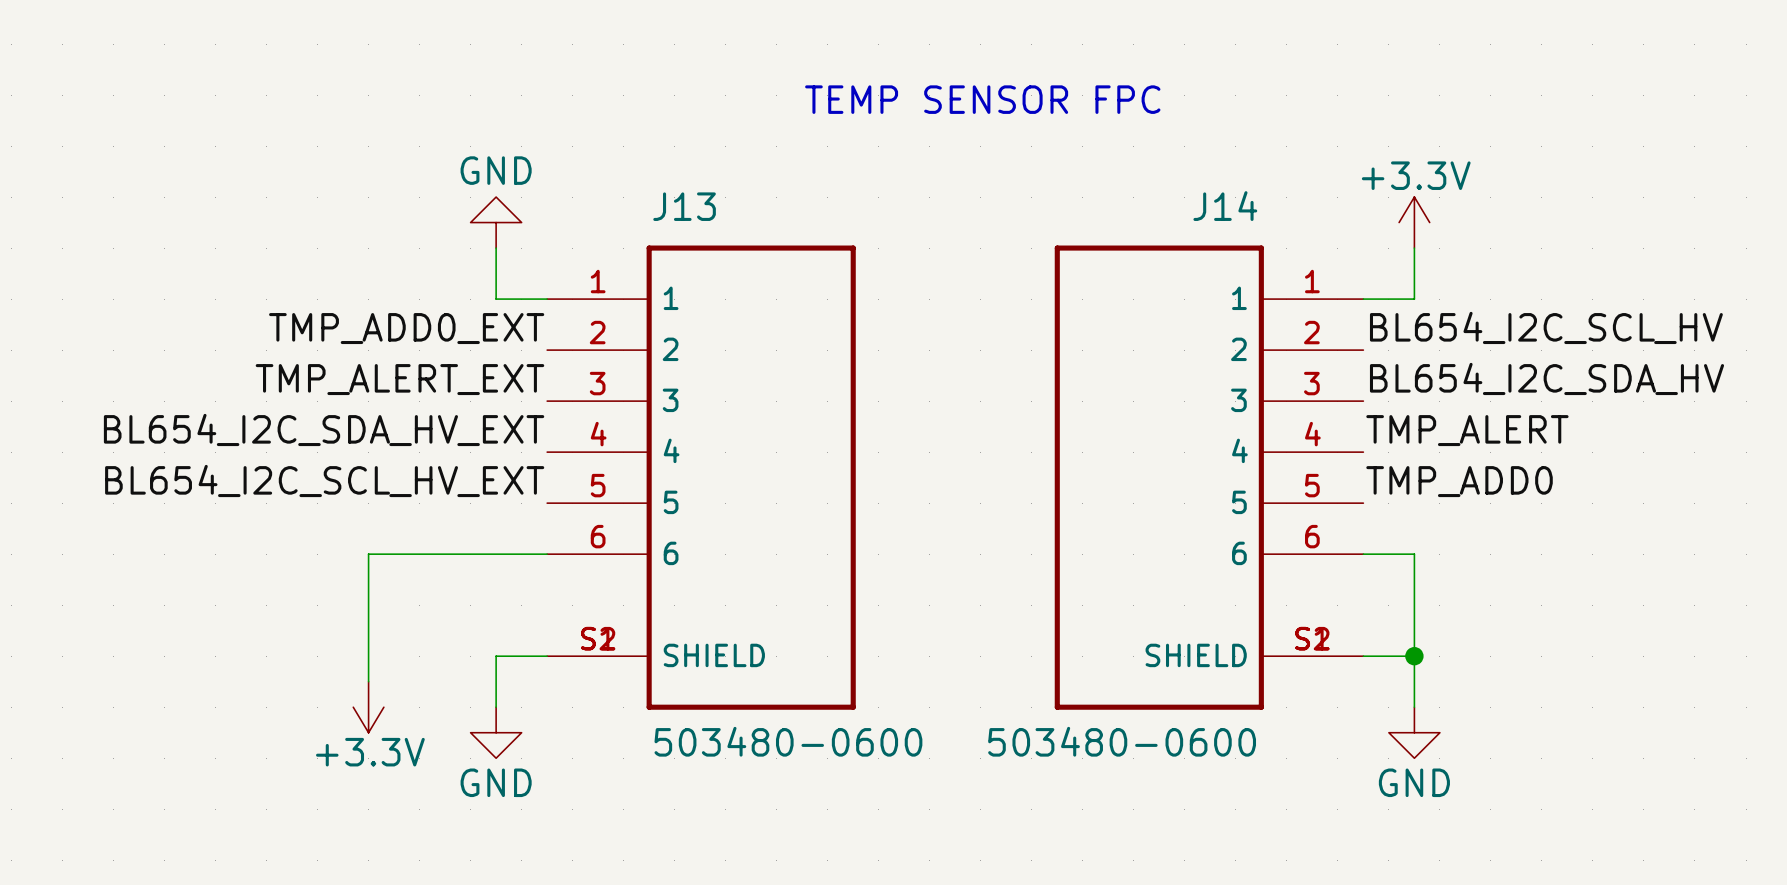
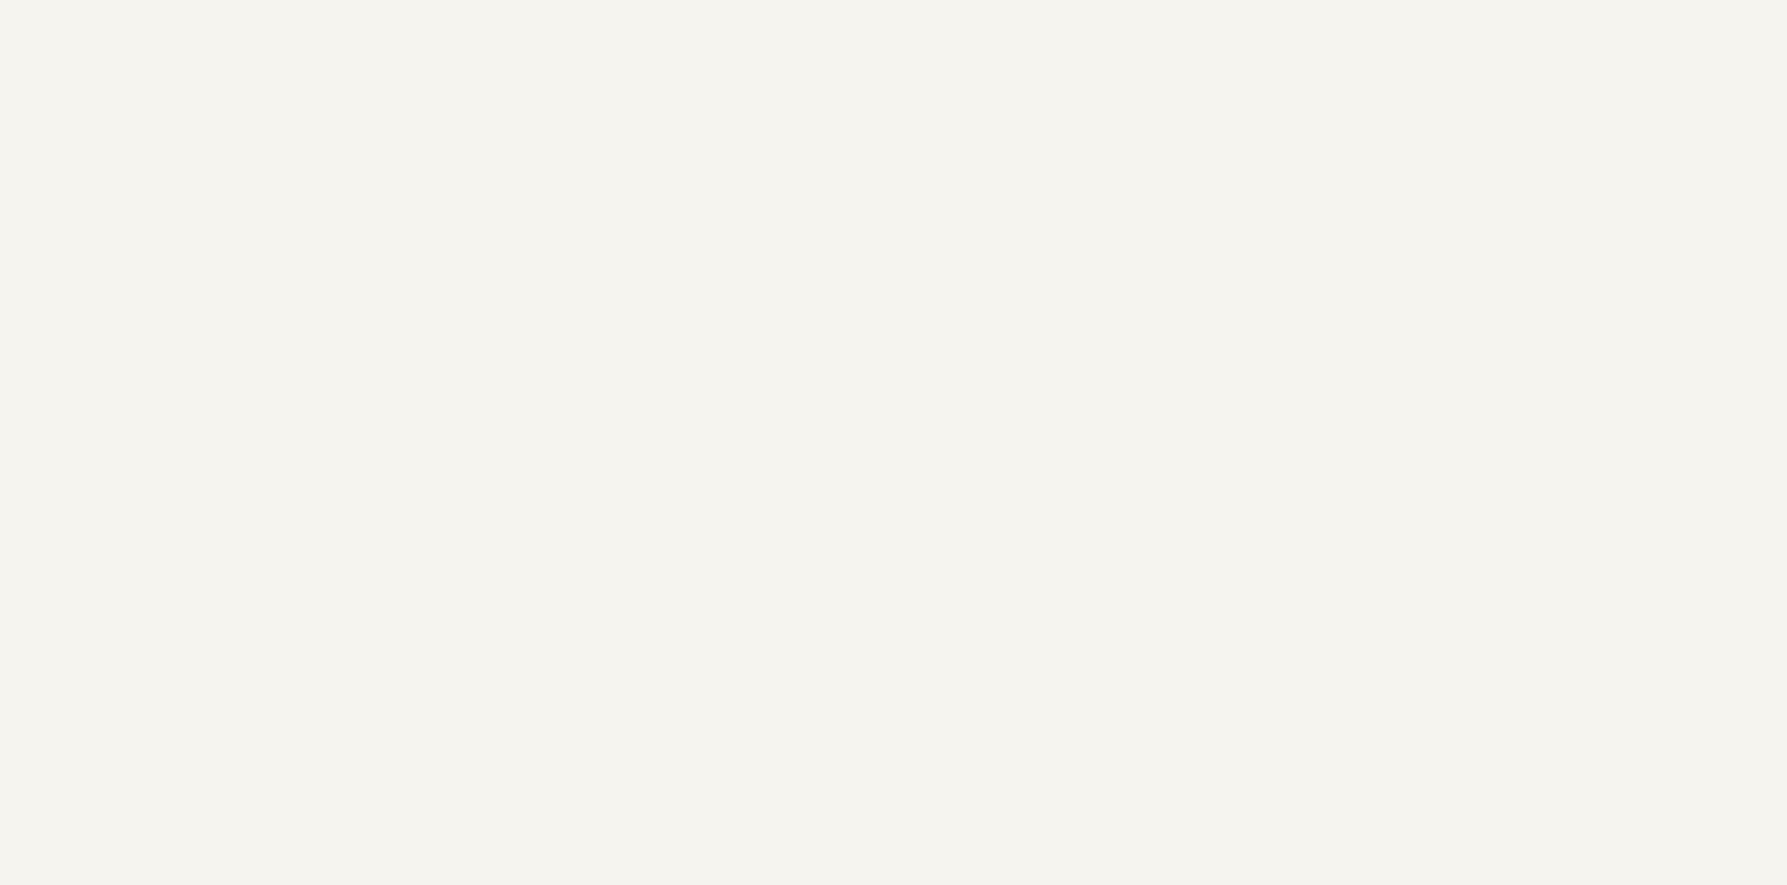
text: TEMP SENSOR FPC (982, 99) -> none
power symbol: GND (496, 222) -> none
power symbol: +3.3V (1414, 222) -> none
wire: (496, 248) (496, 299) (547, 299) -> none
wire: (1414, 248) (1414, 299) (1363, 299) -> none
label: BL654_I2C_SCL_HV (1546, 327) -> none
label: TMP_ADD0_EXT (406, 328) -> none
label: BL654_I2C_SDA_HV (1546, 378) -> none
label: TMP_ALERT_EXT (399, 379) -> none
label: BL654_I2C_SDA_HV_EXT (324, 429) -> none
label: TMP_ALERT (1467, 430) -> none
J13: 503480-0600 (701, 477) -> none
J14: 503480-0600 (1209, 477) -> none
label: BL654_I2C_SCL_HV_EXT (324, 480) -> none
label: TMP_ADD0 (1459, 481) -> none
wire: (547, 554) (368, 554) (368, 681) -> none
wire: (1363, 554) (1414, 554) (1414, 707) -> none
wire: (547, 656) (496, 656) (496, 707) -> none
wire: (1363, 656) (1414, 656) -> none
junction: (1414, 656) -> none
power symbol: +3.3V (368, 707) -> none
power symbol: GND (496, 732) -> none
power symbol: GND (1414, 732) -> none

